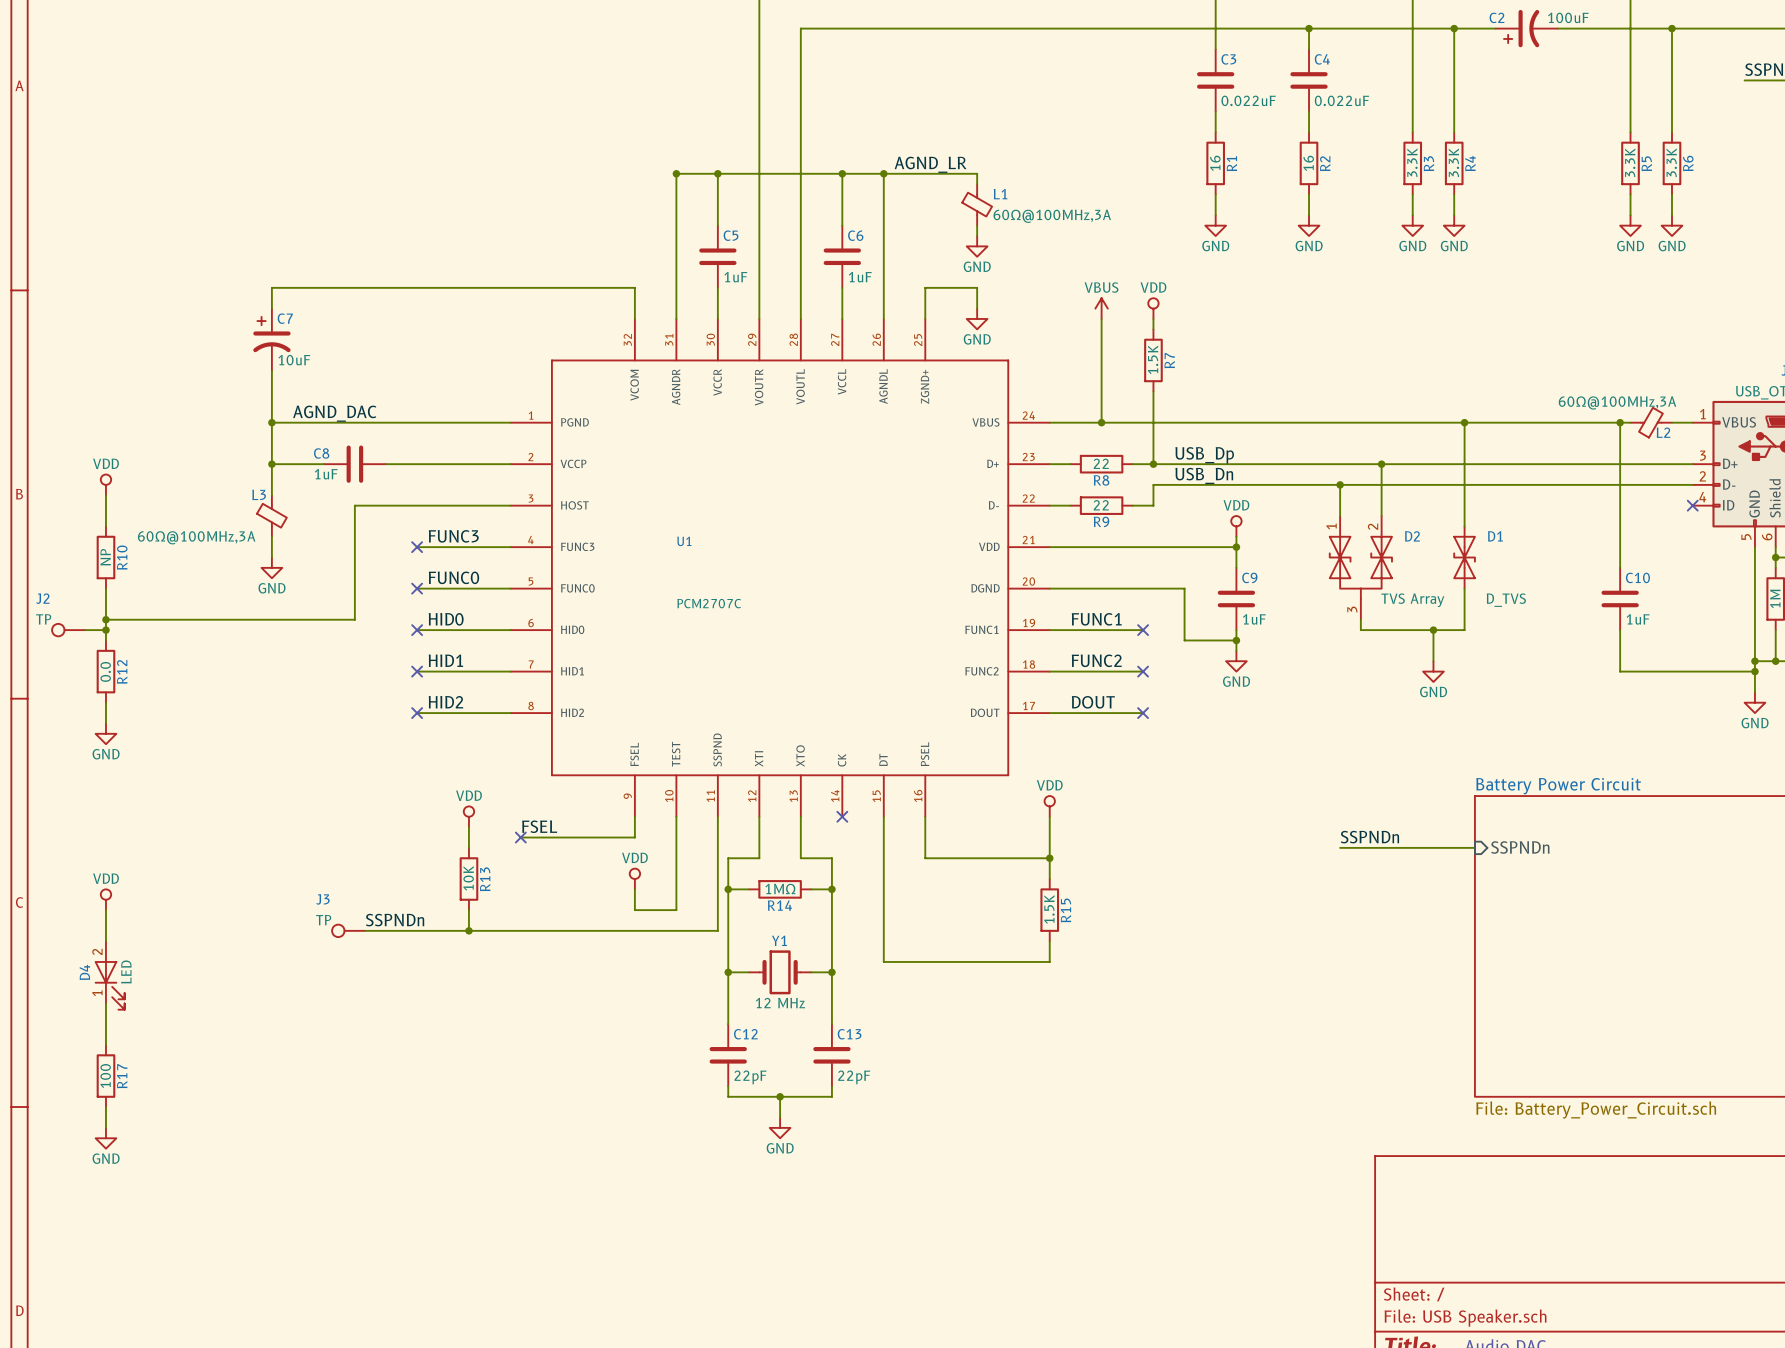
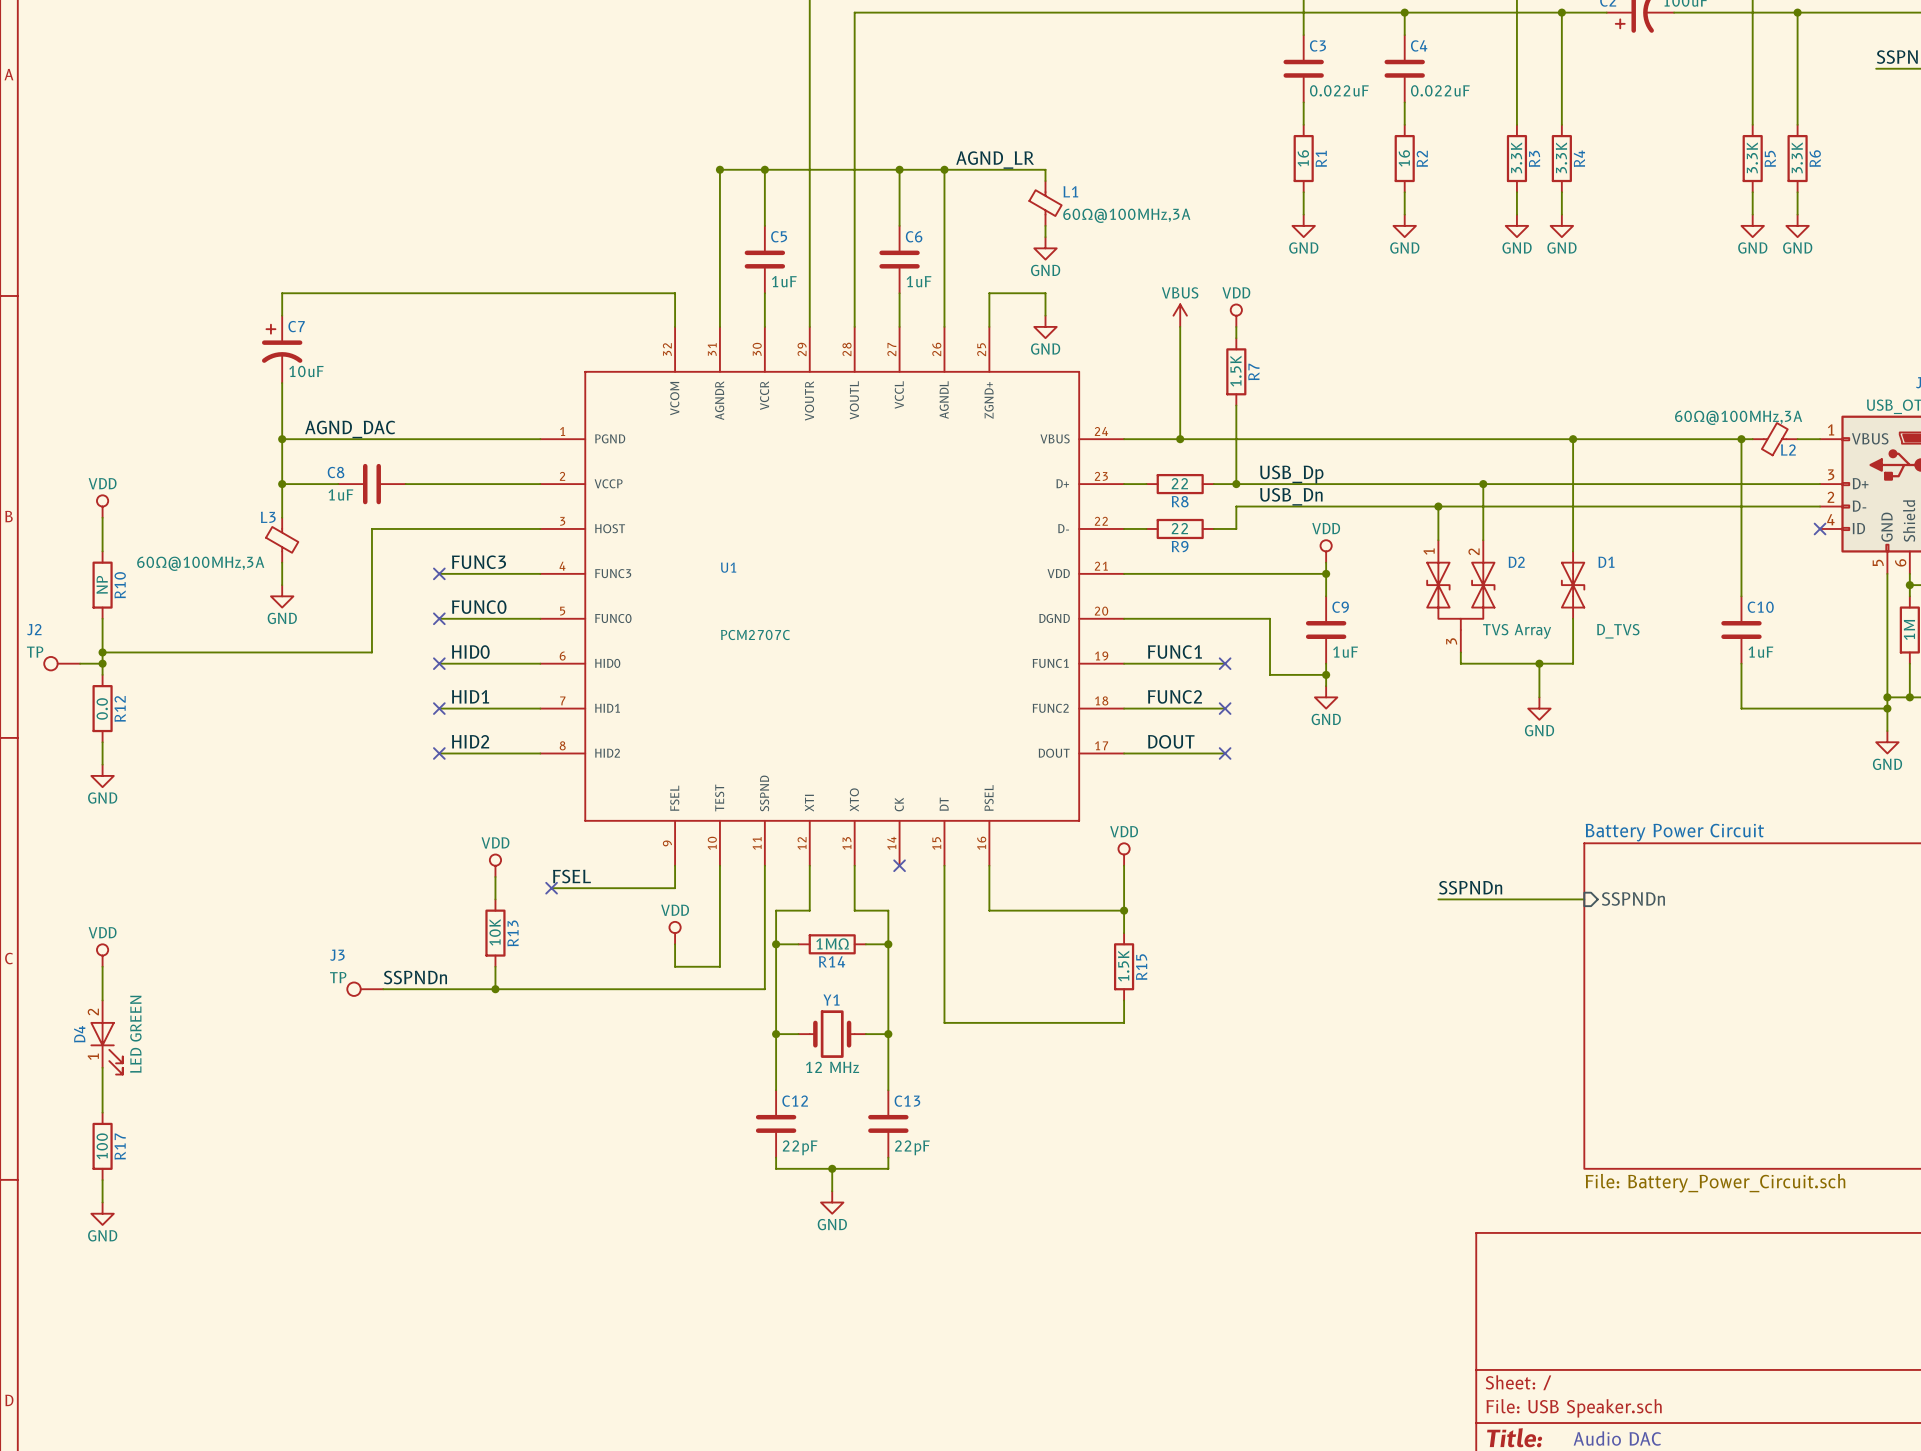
D4 value: LED (126, 972) -> LED GREEN (135, 1034)

